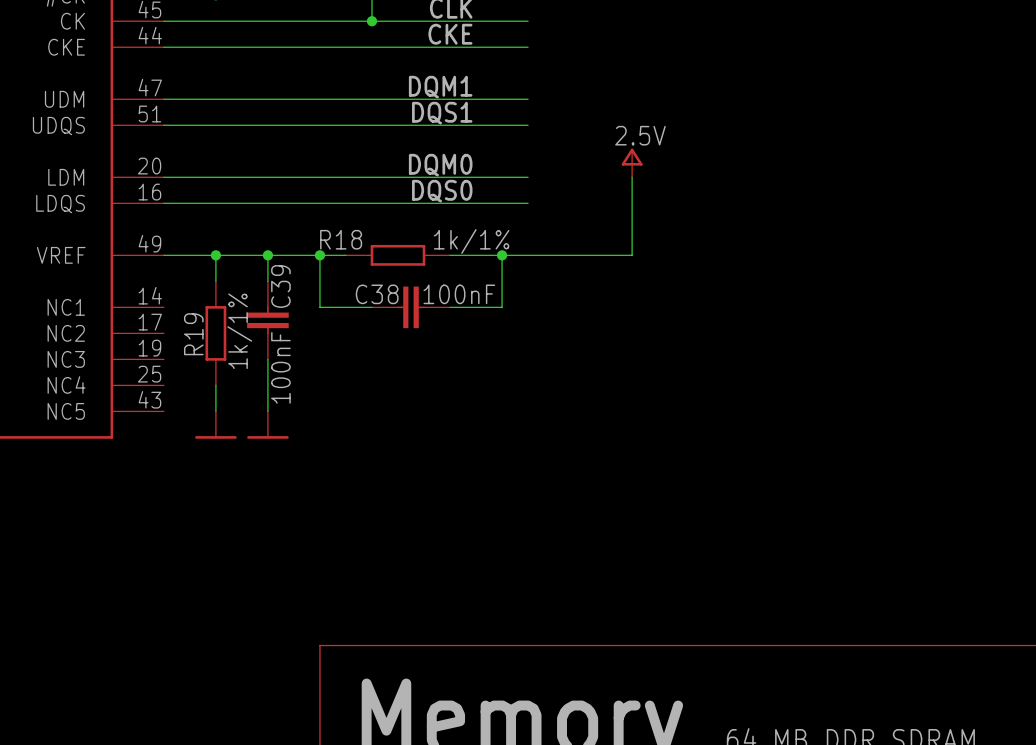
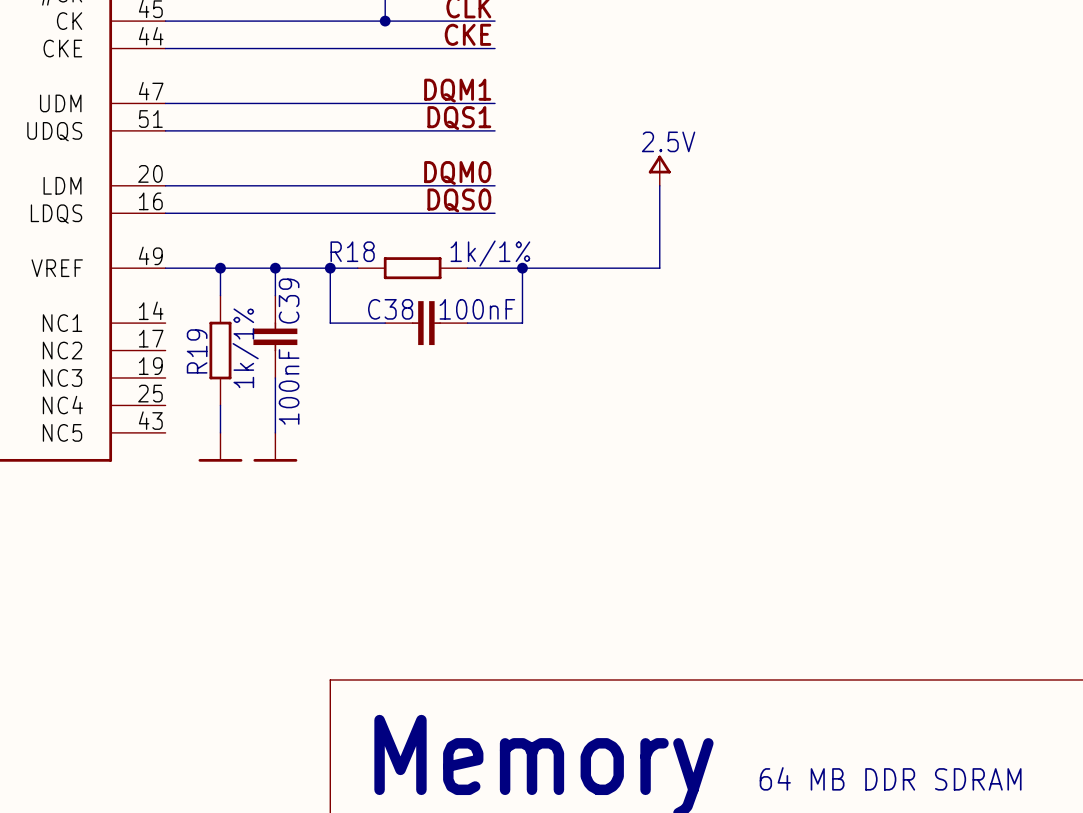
wire: (476, 21) (528, 21) -> none
wire: (476, 47) (528, 47) -> none
wire: (476, 99) (528, 99) -> none
wire: (476, 125) (528, 125) -> none
wire: (476, 177) (528, 177) -> none
wire: (476, 203) (528, 203) -> none

